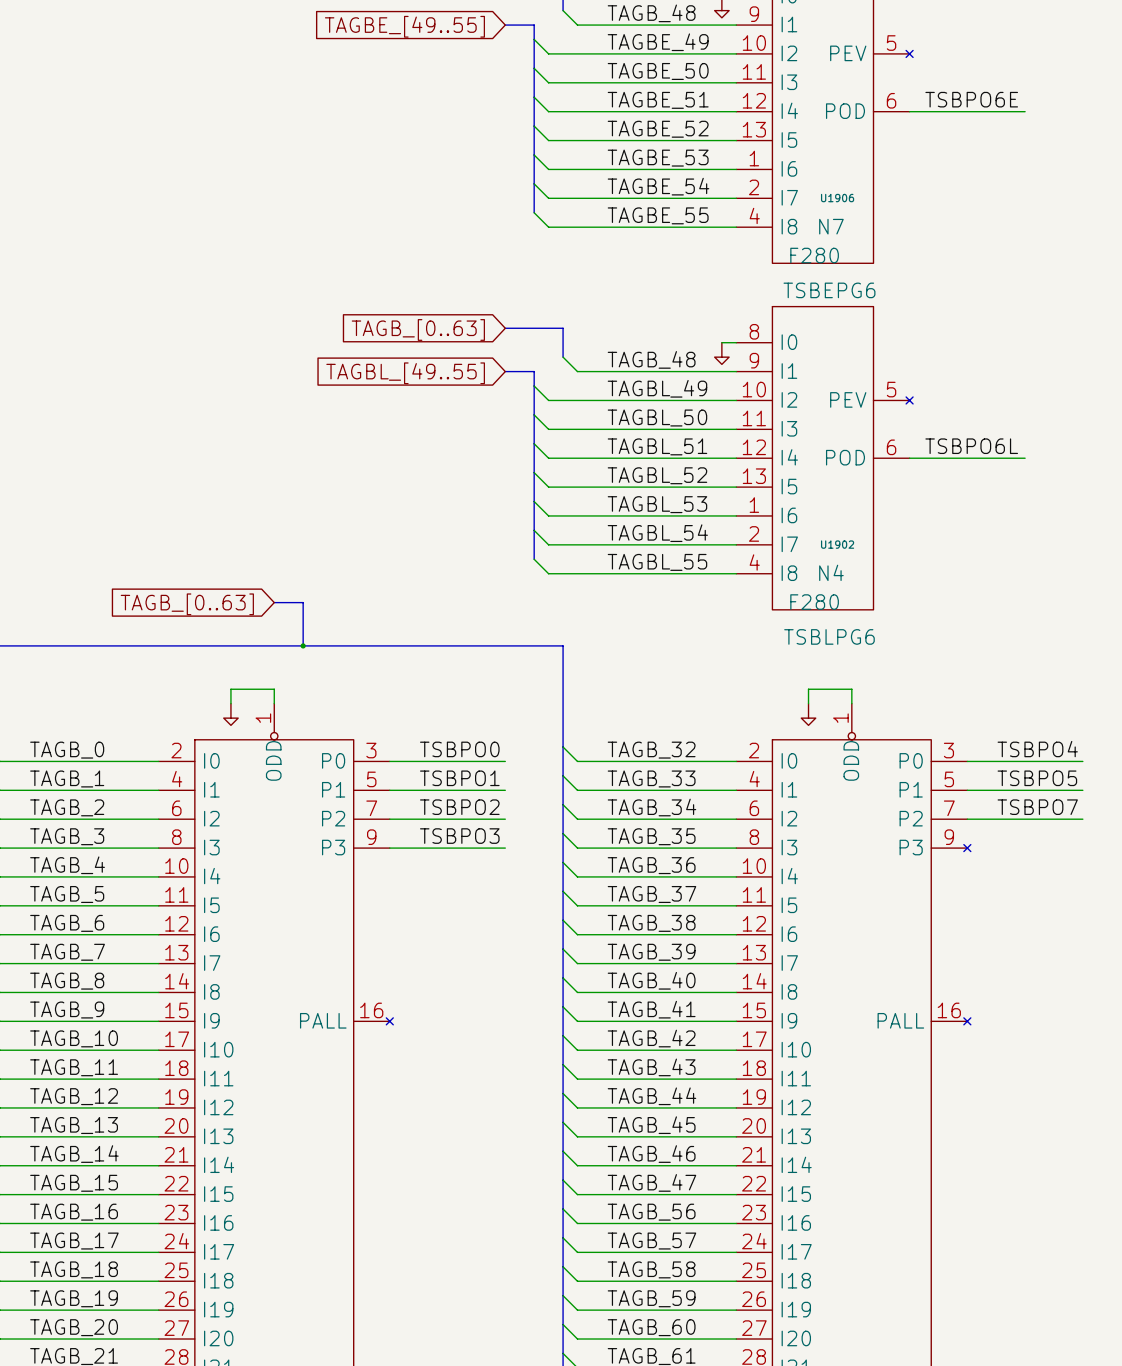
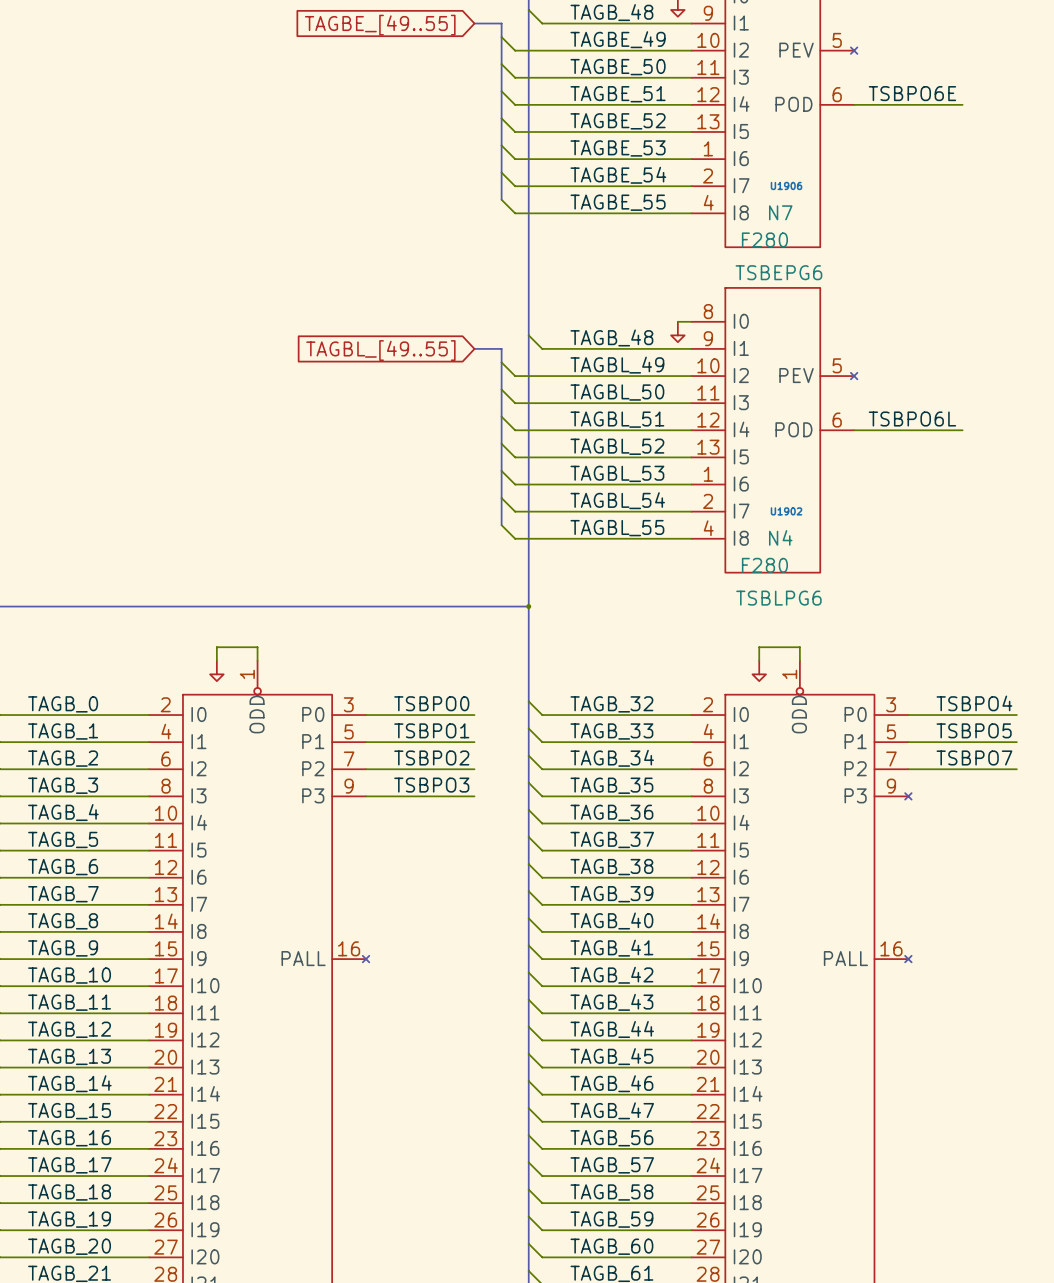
bus: (505, 328) (563, 328) -> (528, 9) (528, 308)
global label: TAGB_[0..63] (418, 329) -> none
bus: none -> (528, 335) (528, 606)
bus: (274, 602) (303, 602) (303, 645) -> none
global label: TAGB_[0..63] (187, 604) -> none
junction: (303, 645) -> none
junction: none -> (528, 606)

